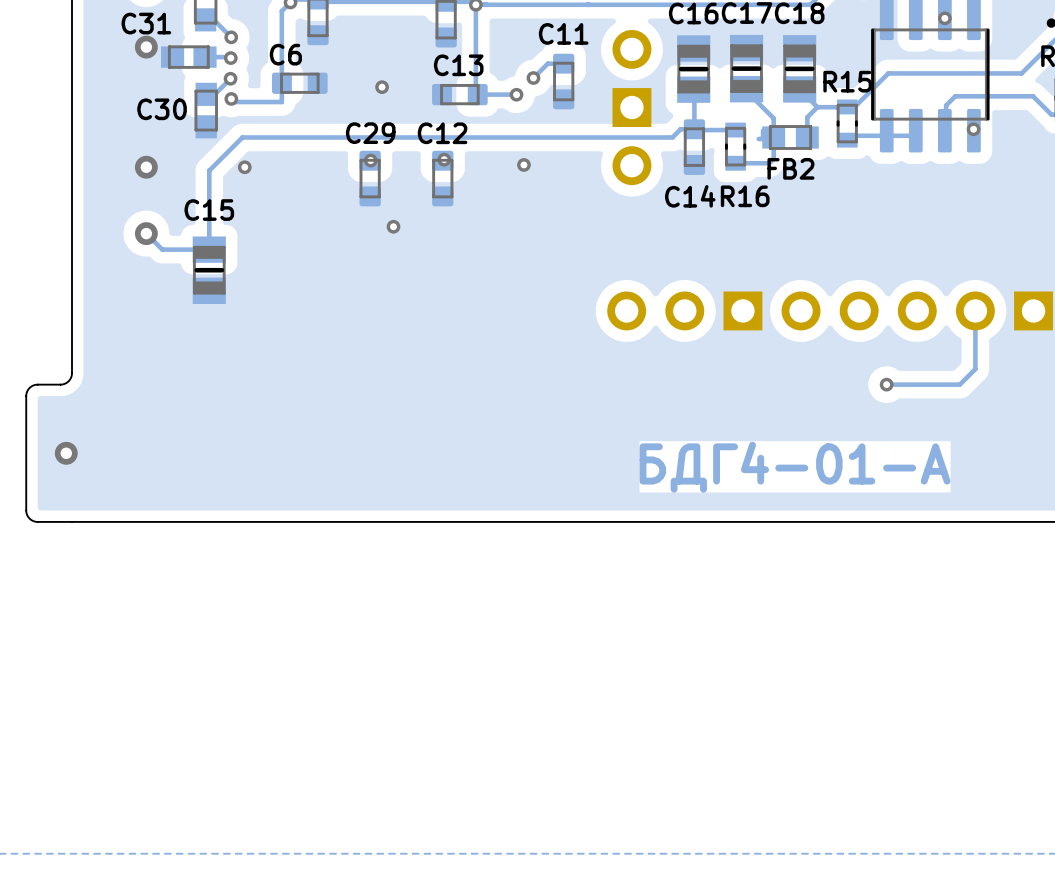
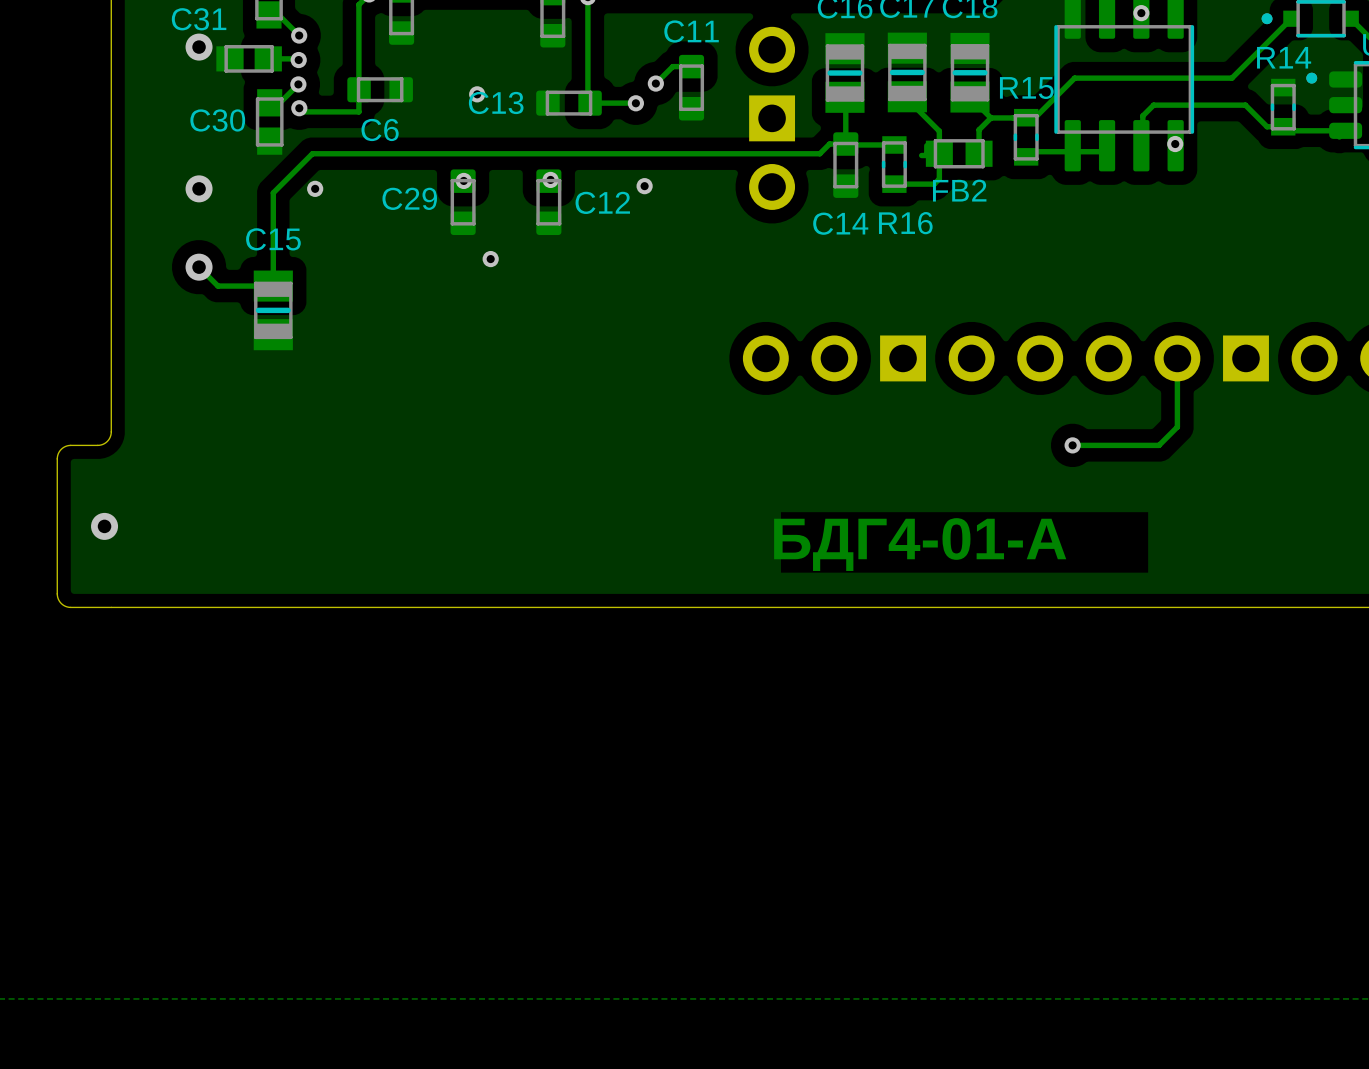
C6 name position: C6 (285, 54) -> C6 (380, 129)
C13 name position: C13 (458, 65) -> C13 (496, 102)
C29 name position: C29 (370, 133) -> C29 (409, 198)
C12 name position: C12 (442, 133) -> C12 (602, 202)

